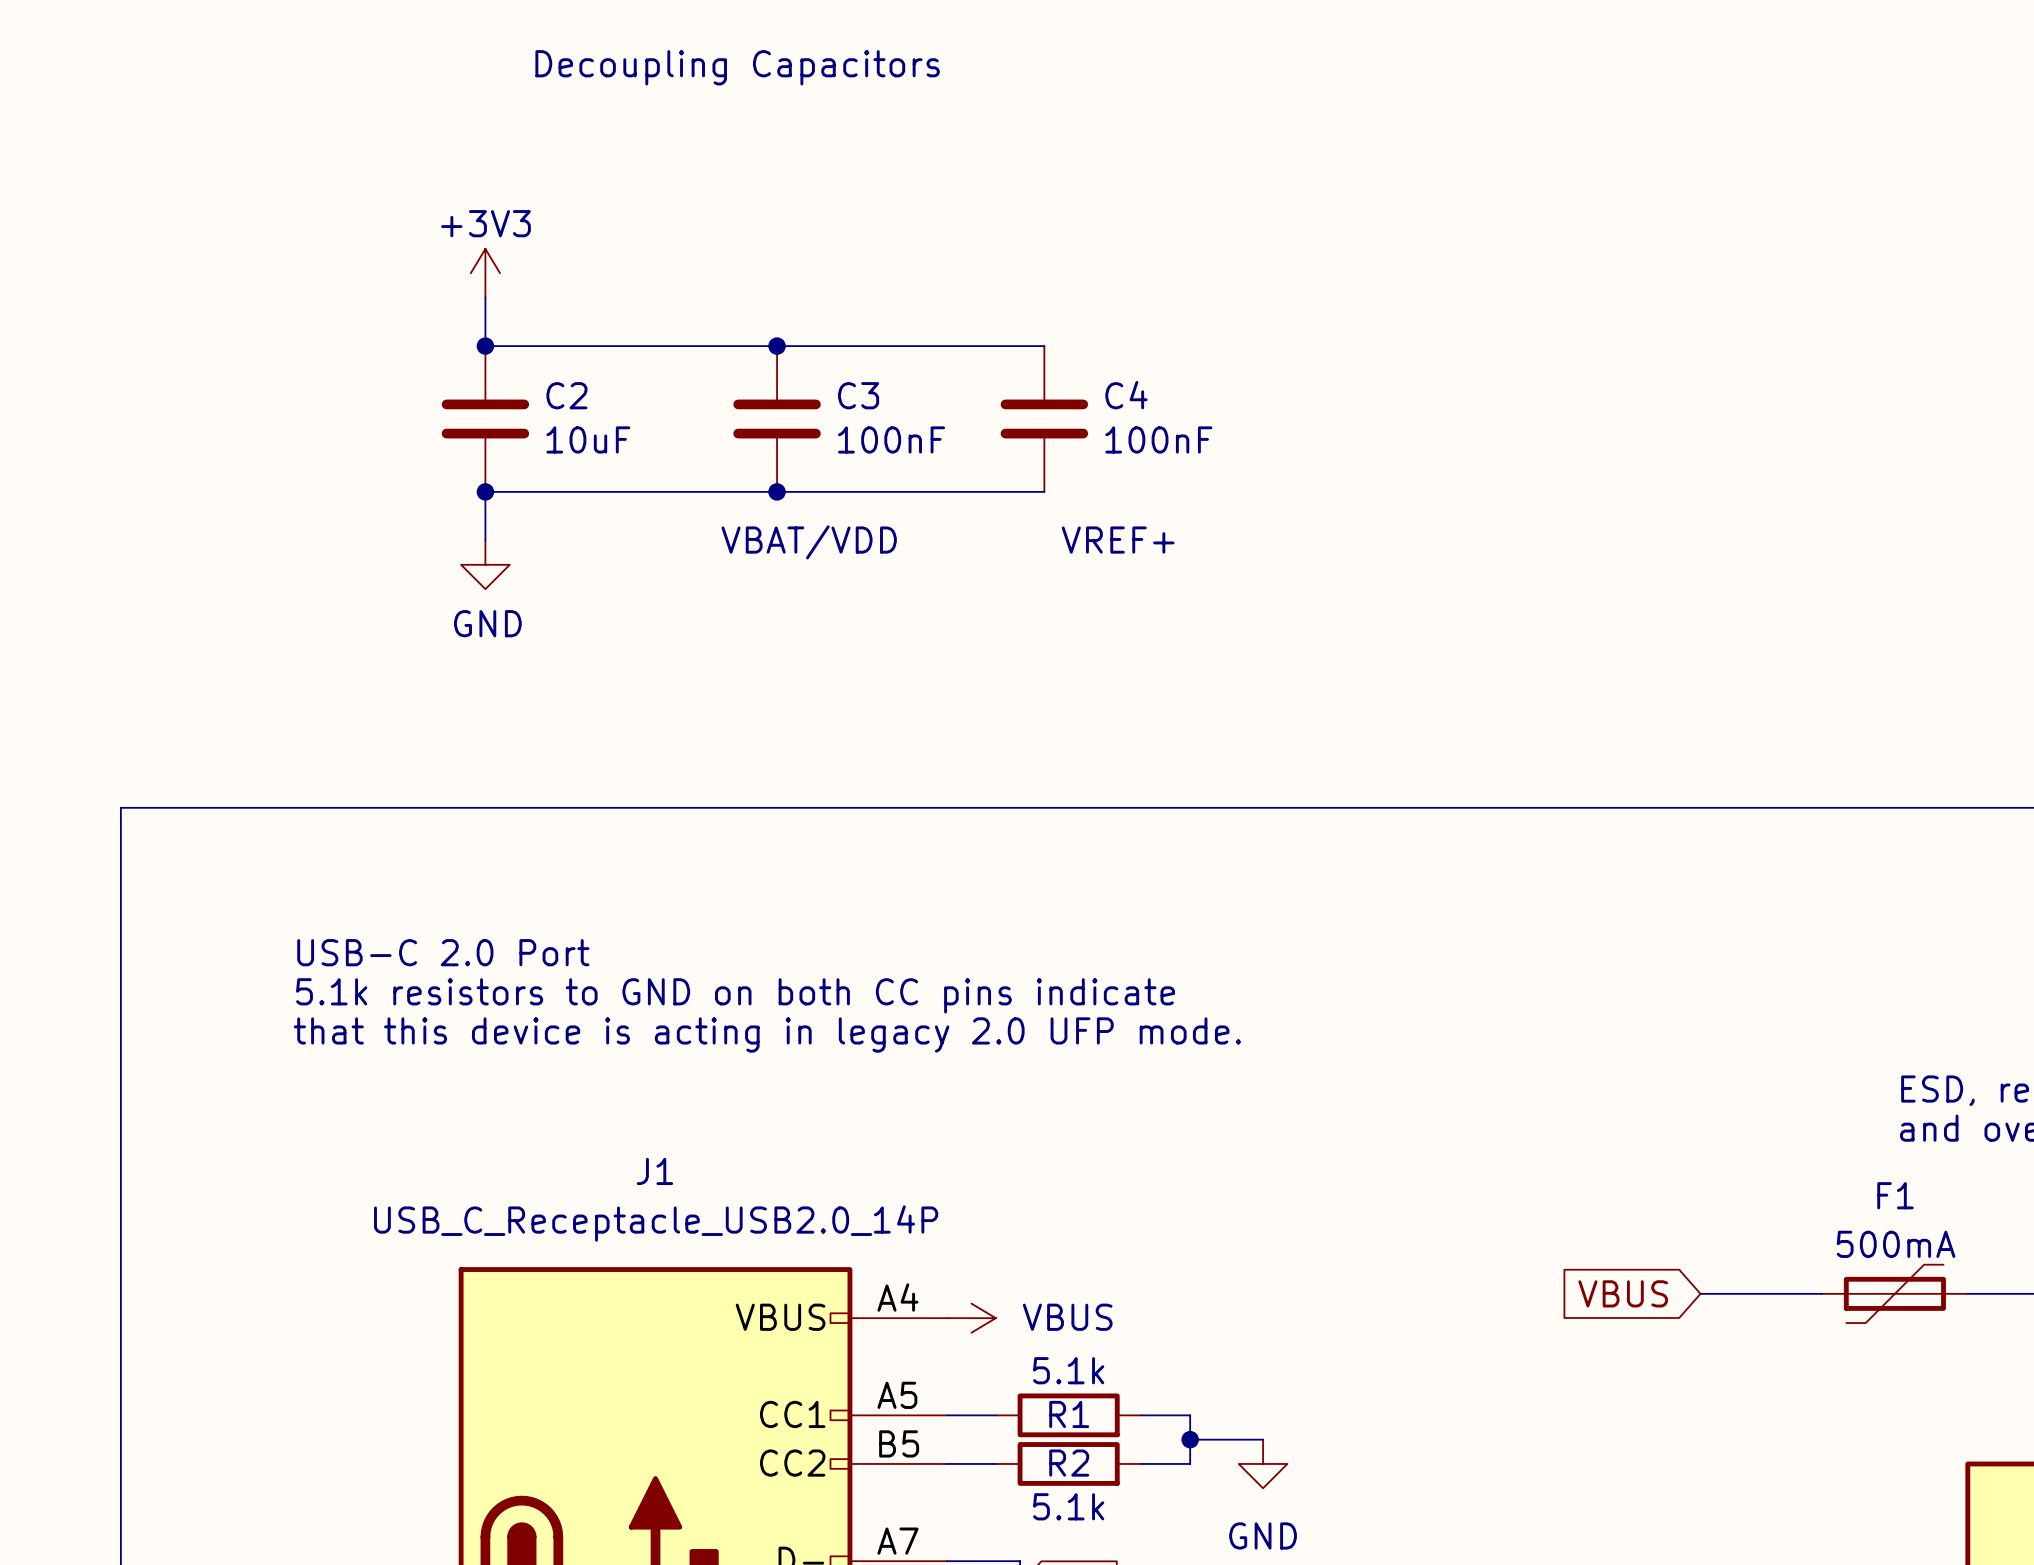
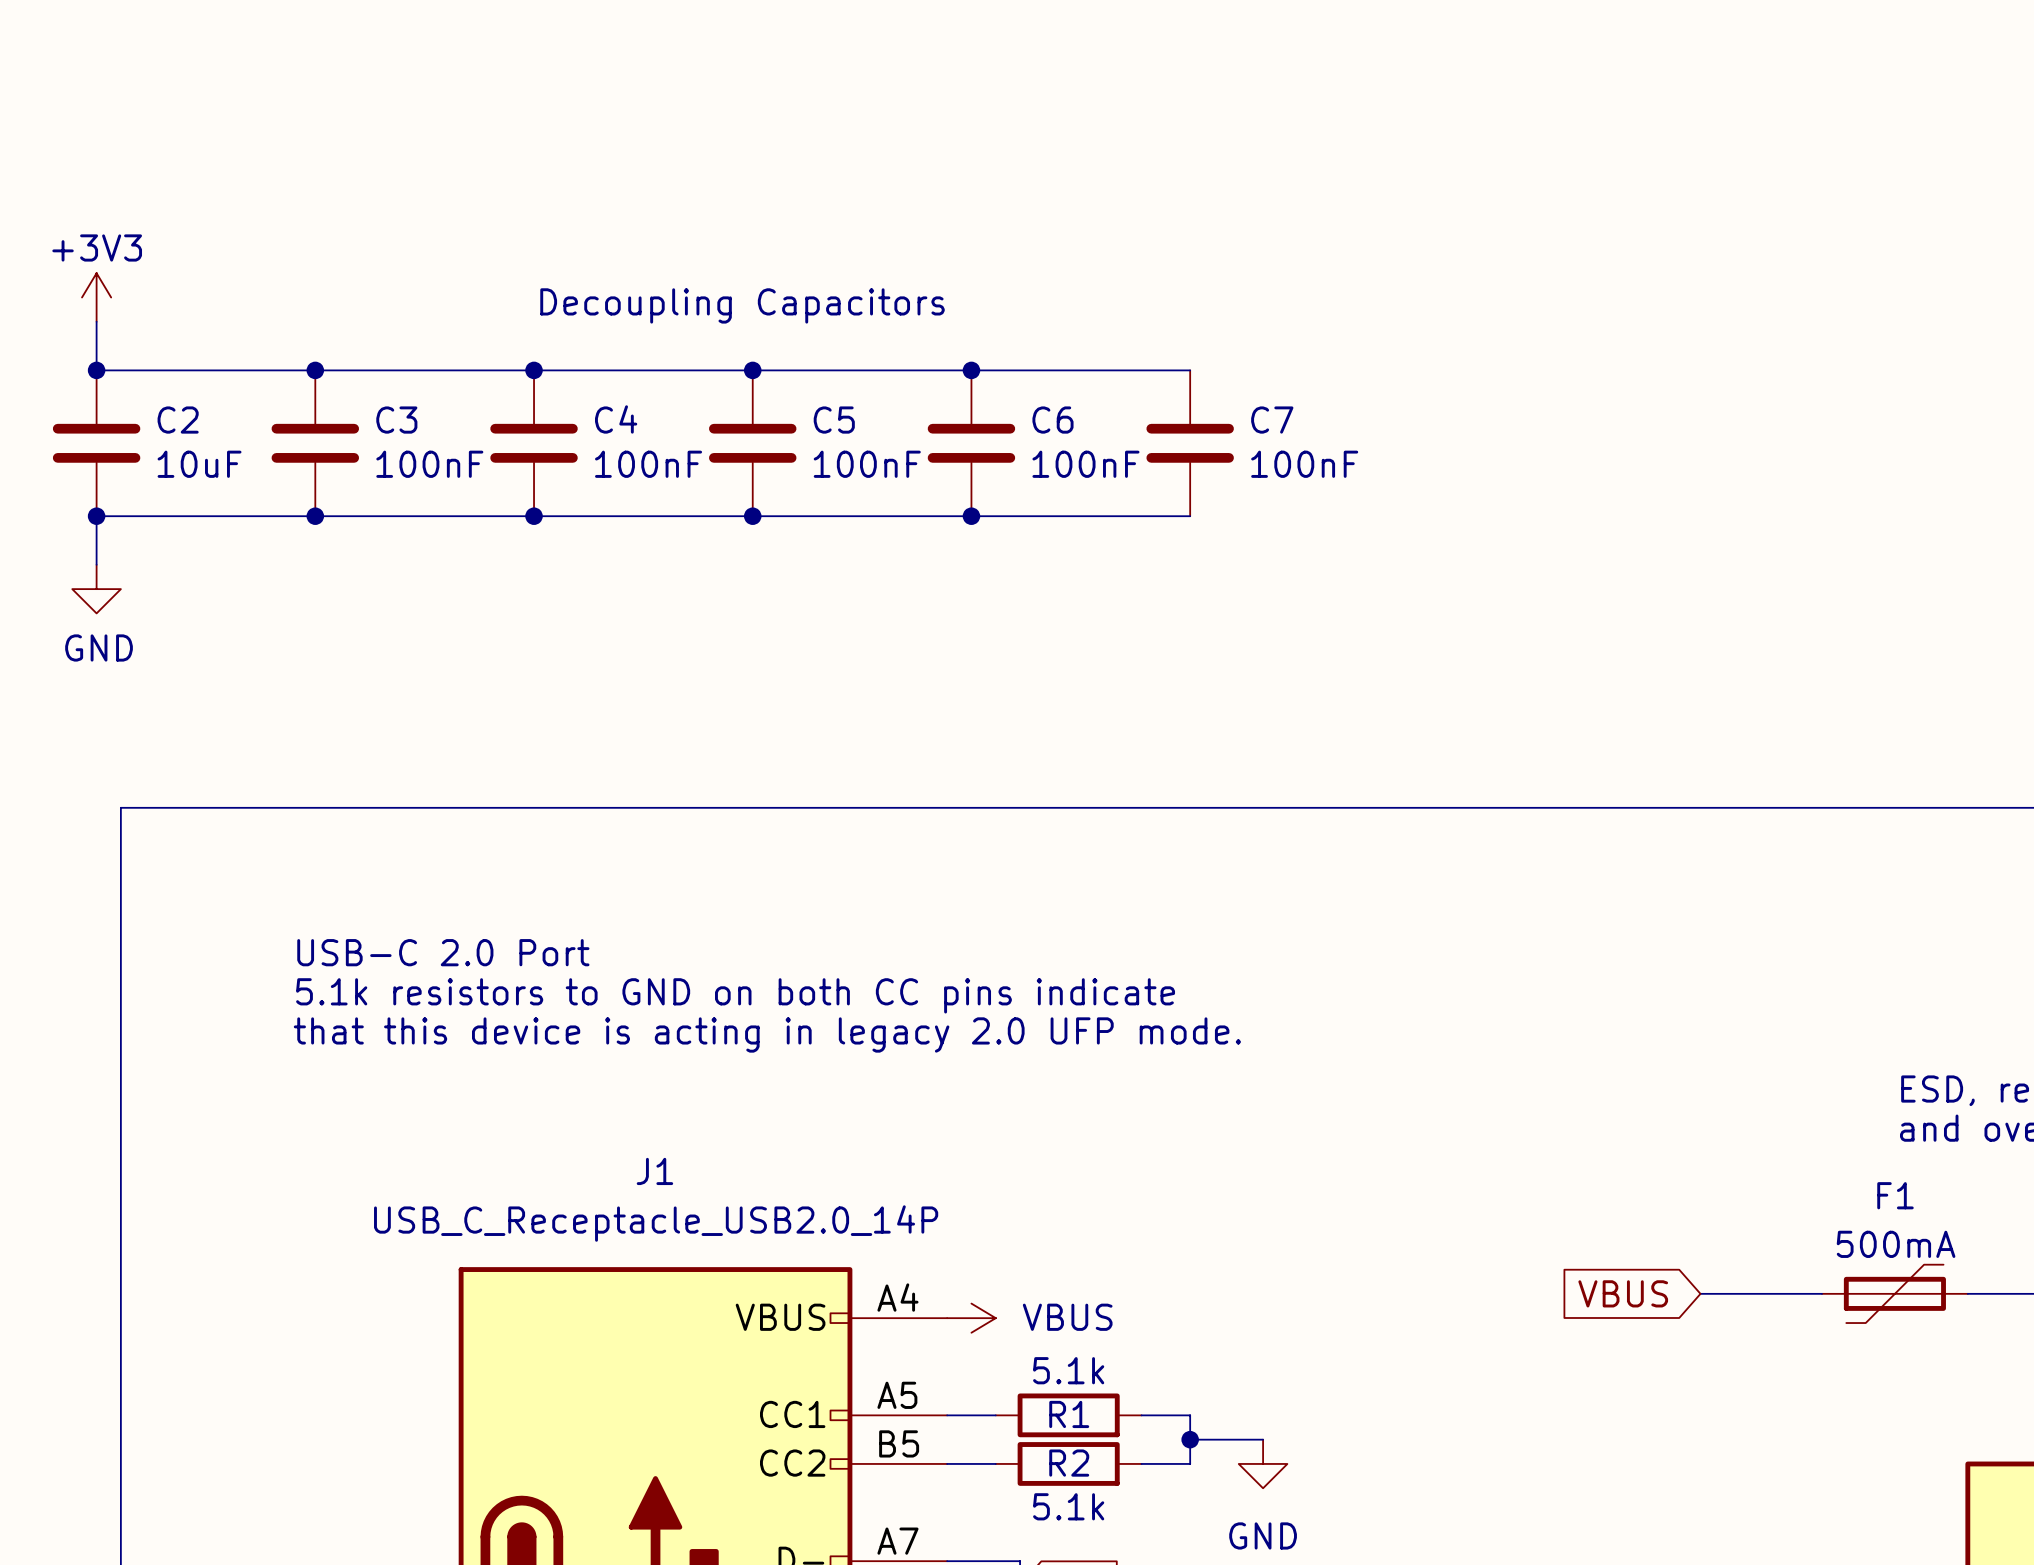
text position: Decoupling Capacitors (737, 67) -> Decoupling Capacitors (742, 305)
power symbol position: +3V3 (485, 273) -> +3V3 (96, 297)
wire: (485, 297) (485, 346) (1044, 346) -> none
wire: none -> (96, 321) (96, 370) (1190, 370)
junction position: (485, 346) -> (534, 370)
junction position: (777, 346) -> (752, 370)
junction: none -> (96, 370)
junction: none -> (315, 370)
junction: none -> (971, 370)
C2 position: (485, 419) -> (96, 443)
C3 position: (777, 419) -> (315, 443)
C4 position: (1044, 419) -> (534, 443)
C5: none -> 100nF (752, 443)
C6: none -> 100nF (971, 443)
C7: none -> 100nF (1190, 443)
junction position: (485, 491) -> (534, 516)
junction position: (777, 491) -> (752, 516)
wire: (1044, 491) (485, 491) (485, 540) -> none
junction: none -> (96, 516)
junction: none -> (315, 516)
junction: none -> (971, 516)
wire: none -> (1190, 516) (96, 516) (96, 564)
text: VREF+ (1118, 540) -> none
text: VBAT/VDD (809, 542) -> none
power symbol position: GND (485, 564) -> GND (96, 589)

